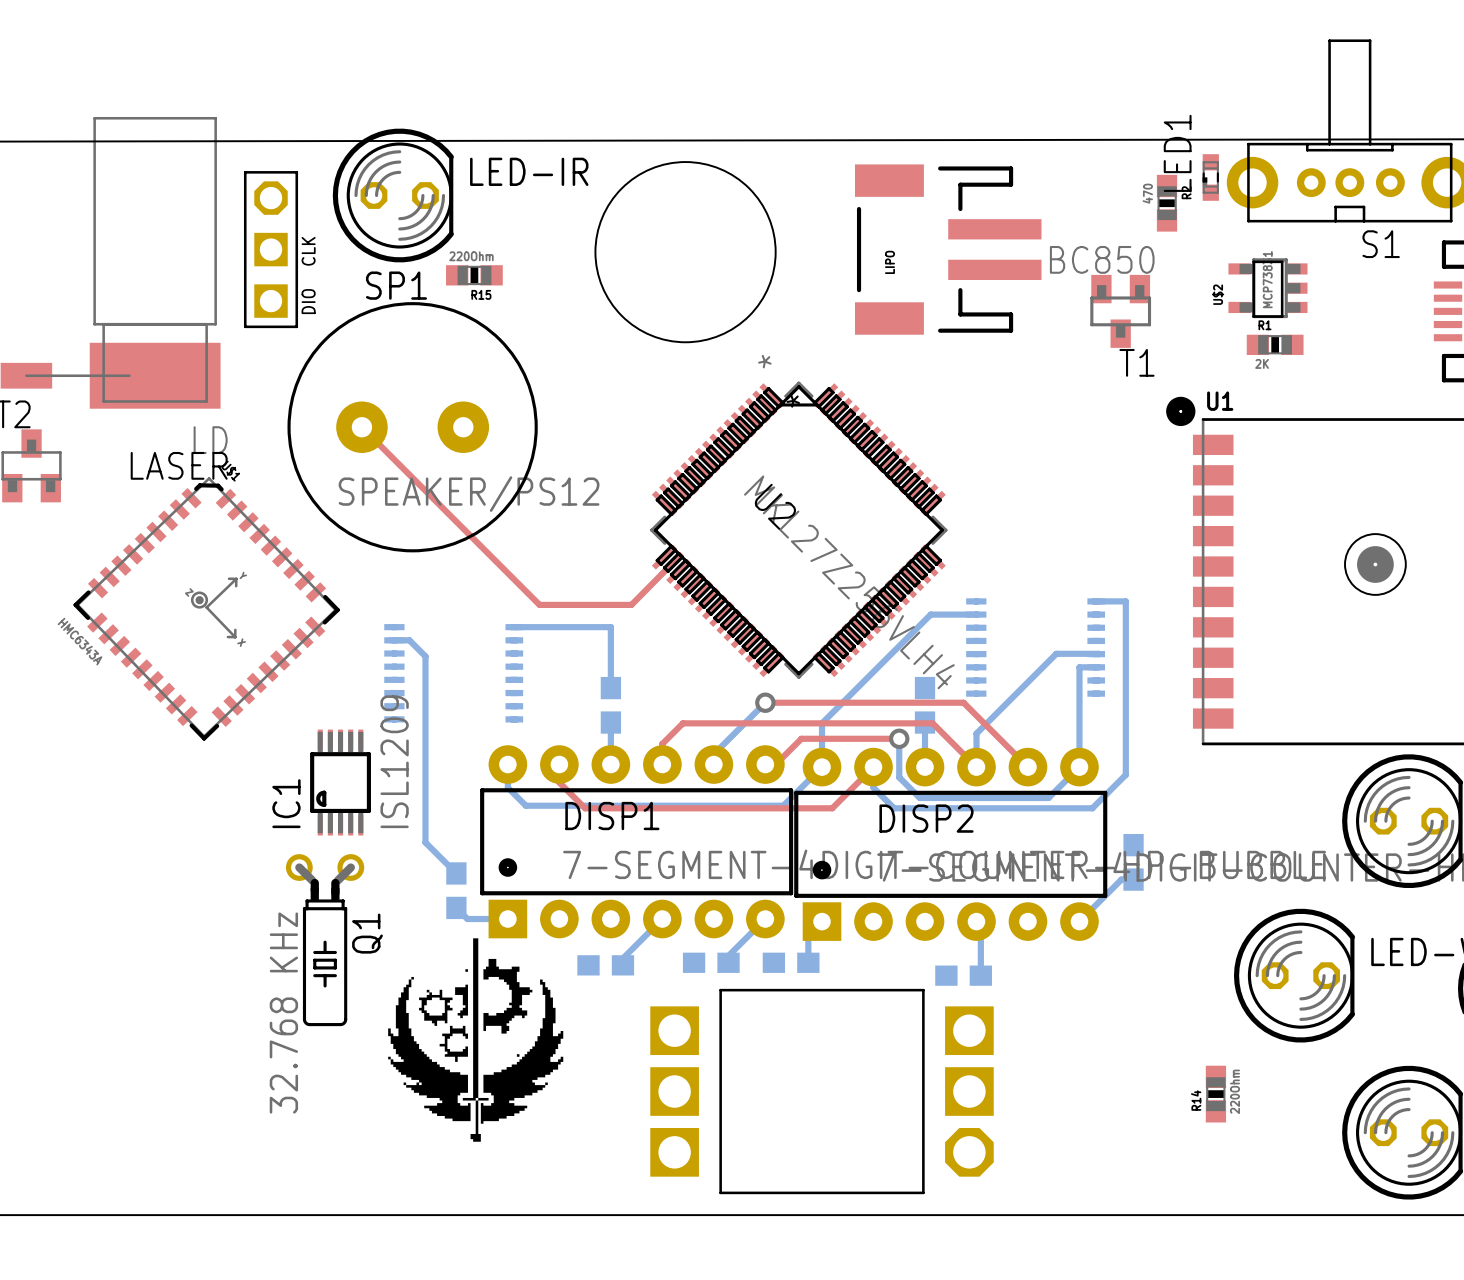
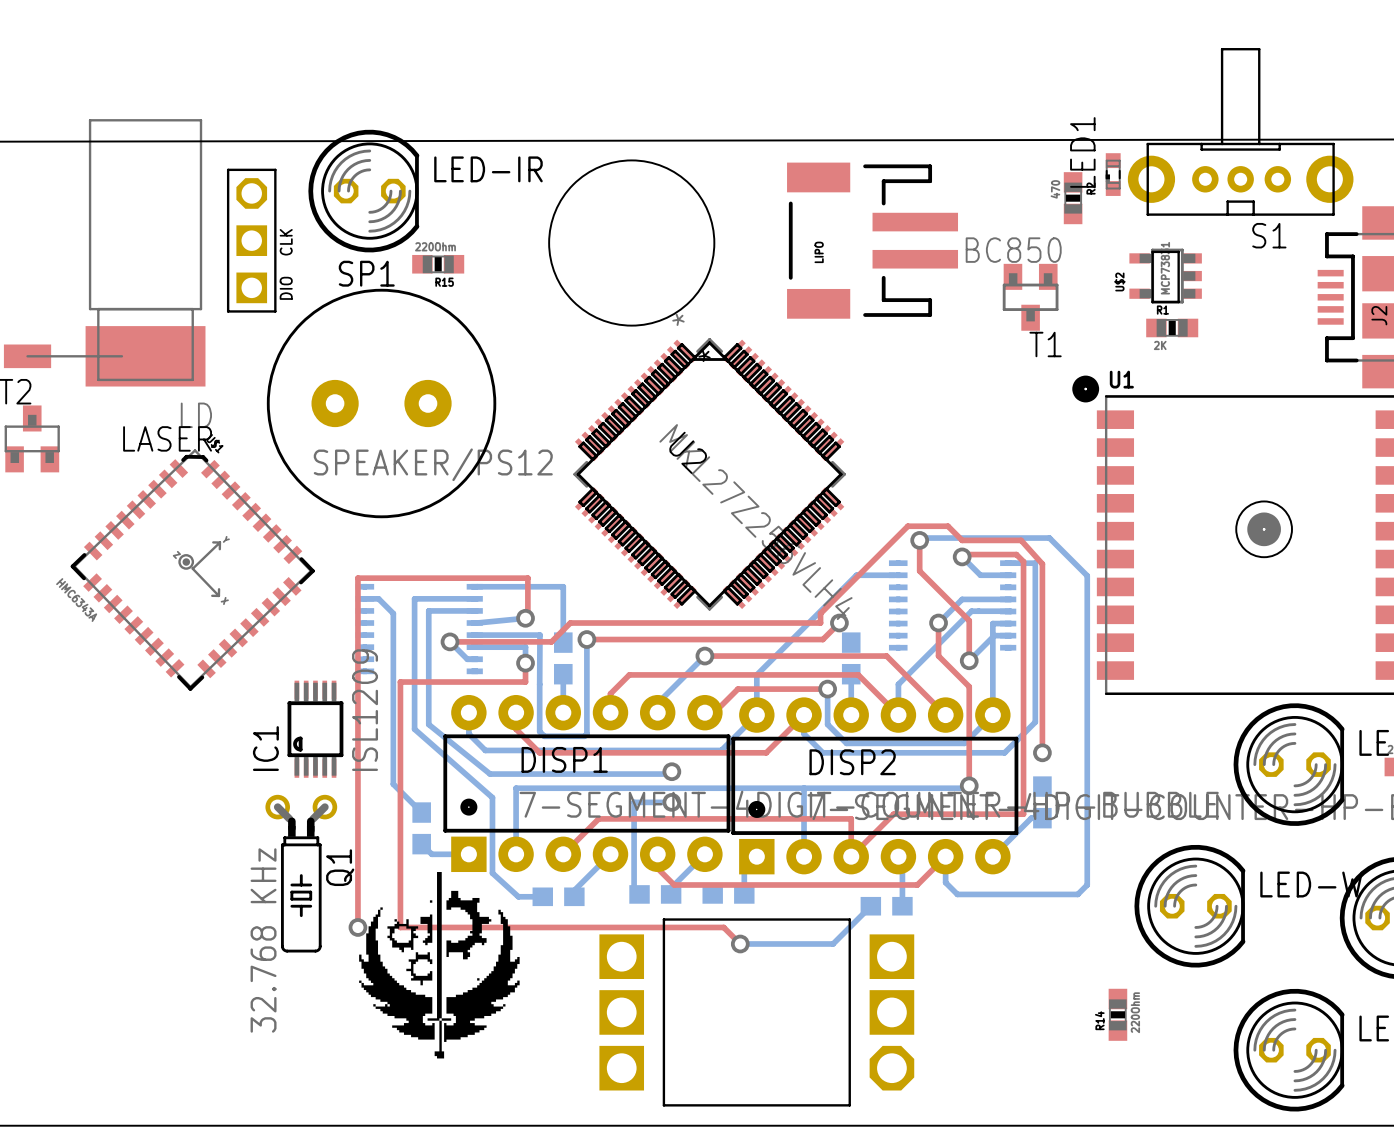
top track: (361, 427) (539, 604) (631, 604) (671, 564) -> none
U2 position: (798, 530) -> (709, 474)
top track: none -> (919, 540) (919, 571) (969, 620) (969, 660)
bottom track: none -> (919, 540) (922, 538) (1049, 538) (1087, 575) (1087, 884) (1077, 894) (957, 894) (945, 882) (945, 856)
via: none -> (919, 540)
top track: none -> (962, 556) (964, 554) (1016, 554) (1023, 561) (1023, 814) (893, 814) (851, 856) (851, 818) (598, 818) (563, 854)
bottom track: none -> (962, 556) (980, 575) (1010, 575)
via: none -> (962, 556)
bottom track: none -> (477, 598) (414, 598) (414, 729) (492, 797) (492, 873) (518, 896) (542, 896)
bottom track: none -> (1010, 599) (962, 599) (938, 623)
bottom track: none -> (477, 610) (428, 610) (428, 724) (490, 774) (669, 774) (671, 771)
top track: none -> (525, 618) (527, 618) (527, 578) (357, 578) (357, 927)
bottom track: none -> (525, 618) (477, 623)
via: none -> (525, 618)
top track: none -> (839, 623) (822, 639) (586, 639)
via: none -> (839, 623)
top track: none -> (938, 623) (938, 656) (969, 686) (969, 785)
via: none -> (938, 623)
bottom track: none -> (477, 635) (539, 635) (539, 731) (544, 736) (584, 736) (586, 733) (586, 639)
bottom track: none -> (1010, 635) (994, 635) (969, 660)
via: none -> (586, 639)
top track: none -> (450, 641) (551, 641) (570, 623) (820, 623) (820, 613) (907, 526) (948, 526) (962, 540) (1021, 540) (1042, 564) (1042, 752)
bottom track: none -> (450, 641) (467, 659) (477, 659)
via: none -> (450, 641)
bottom track: none -> (477, 647) (525, 647) (525, 663)
via: none -> (969, 660)
top track: none -> (525, 663) (525, 682) (400, 682) (400, 927) (723, 927) (740, 943)
via: none -> (525, 663)
via: none -> (1042, 752)
via: none -> (671, 771)
bottom track: none -> (969, 785) (966, 788) (516, 788) (516, 854)
via: none -> (969, 785)
bottom track: none -> (804, 788) (804, 856)
bottom track: none -> (671, 802) (634, 802) (634, 888) (639, 894)
via: none -> (671, 802)
top track: none -> (657, 854) (657, 868) (674, 884) (917, 884) (945, 856)
bottom track: none -> (870, 906) (833, 943) (740, 943)
via: none -> (357, 927)
via: none -> (740, 943)

